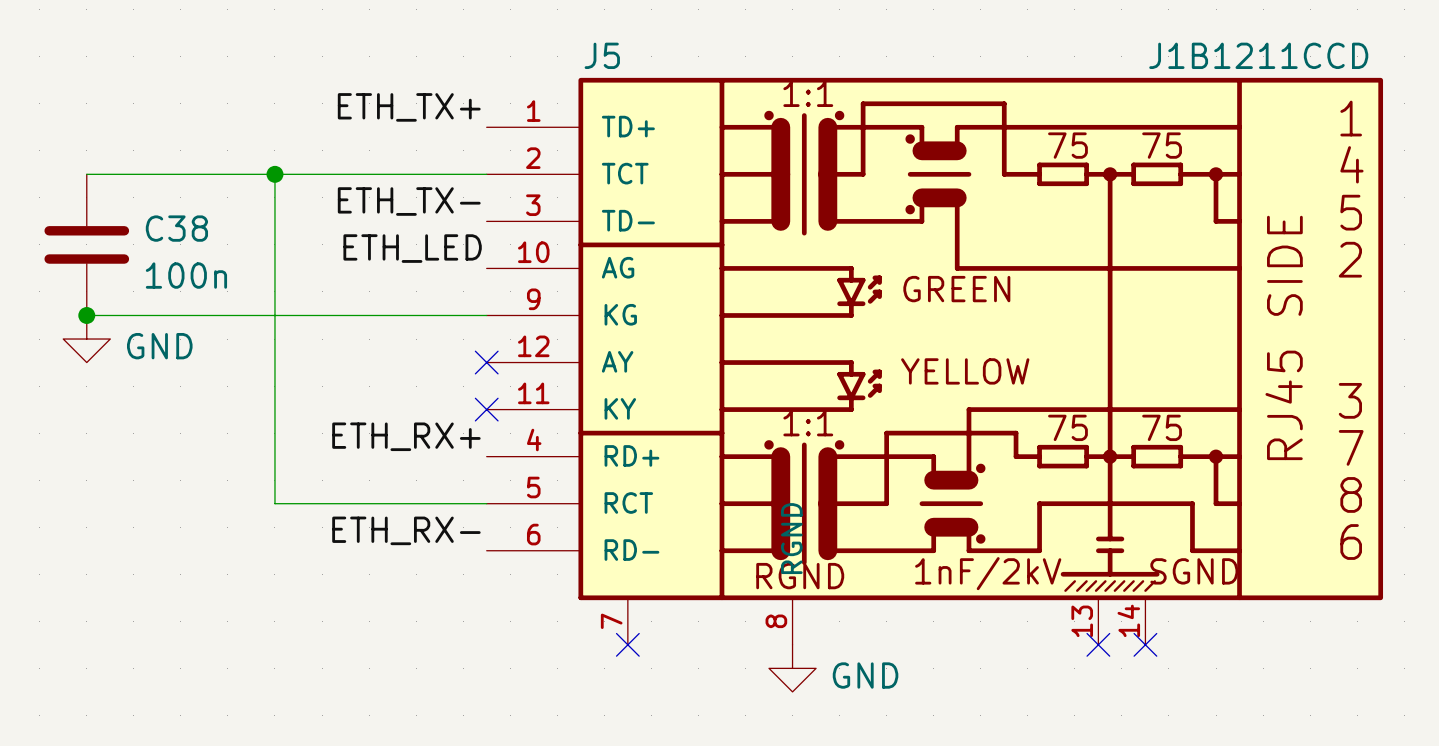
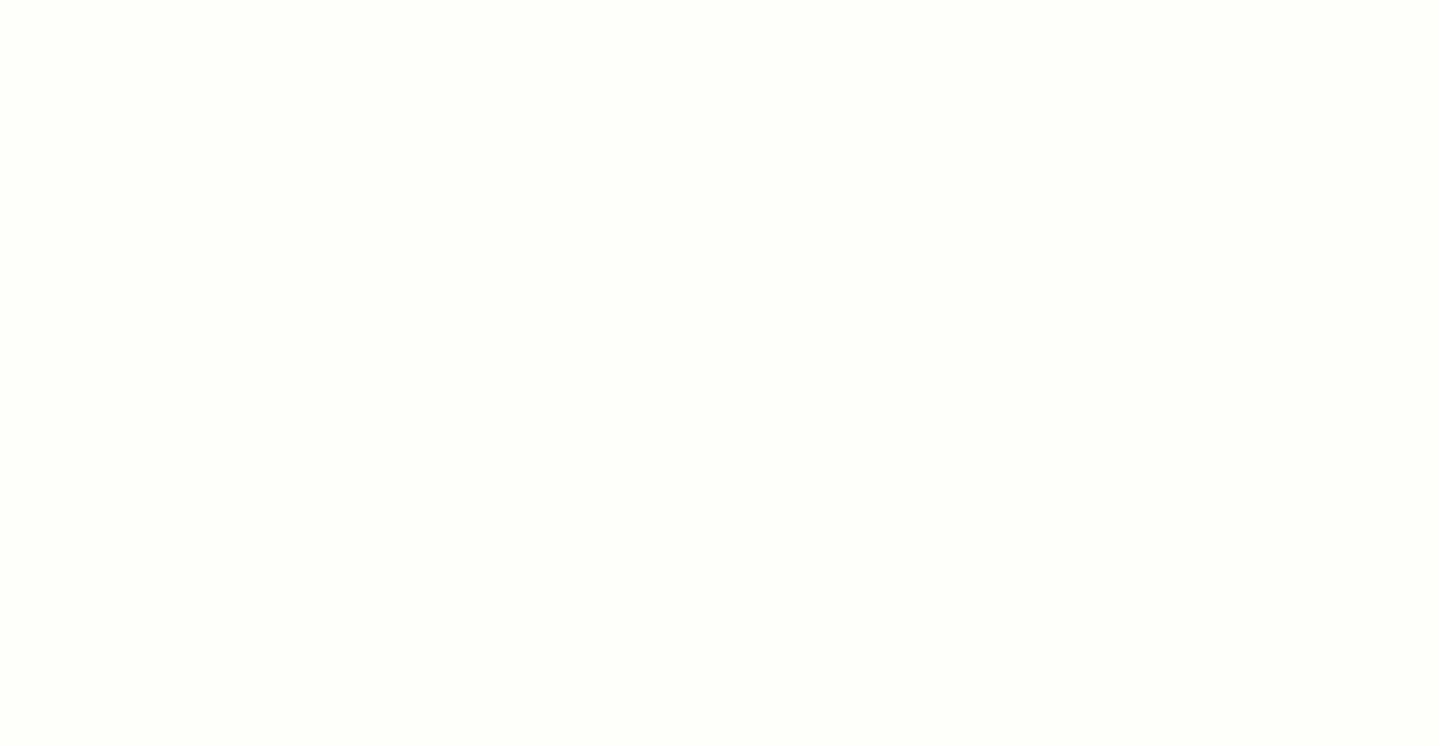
label: ETH_TX+ (409, 107) -> none
wire: (86, 174) (486, 174) -> none
wire: (274, 174) (274, 503) (486, 503) -> none
junction: (274, 174) -> none
label: ETH_TX- (409, 201) -> none
C38: 100n (86, 244) -> none
label: ETH_LED (412, 248) -> none
wire: (86, 315) (486, 315) -> none
junction: (86, 315) -> none
power symbol: GND (86, 339) -> none
J5: J1B1211CCD (934, 361) -> none
no-connect mark: (486, 362) -> none
no-connect mark: (486, 409) -> none
label: ETH_RX+ (406, 436) -> none
label: ETH_RX- (406, 530) -> none
no-connect mark: (627, 644) -> none
no-connect mark: (1098, 644) -> none
no-connect mark: (1145, 644) -> none
power symbol: GND (792, 668) -> none

